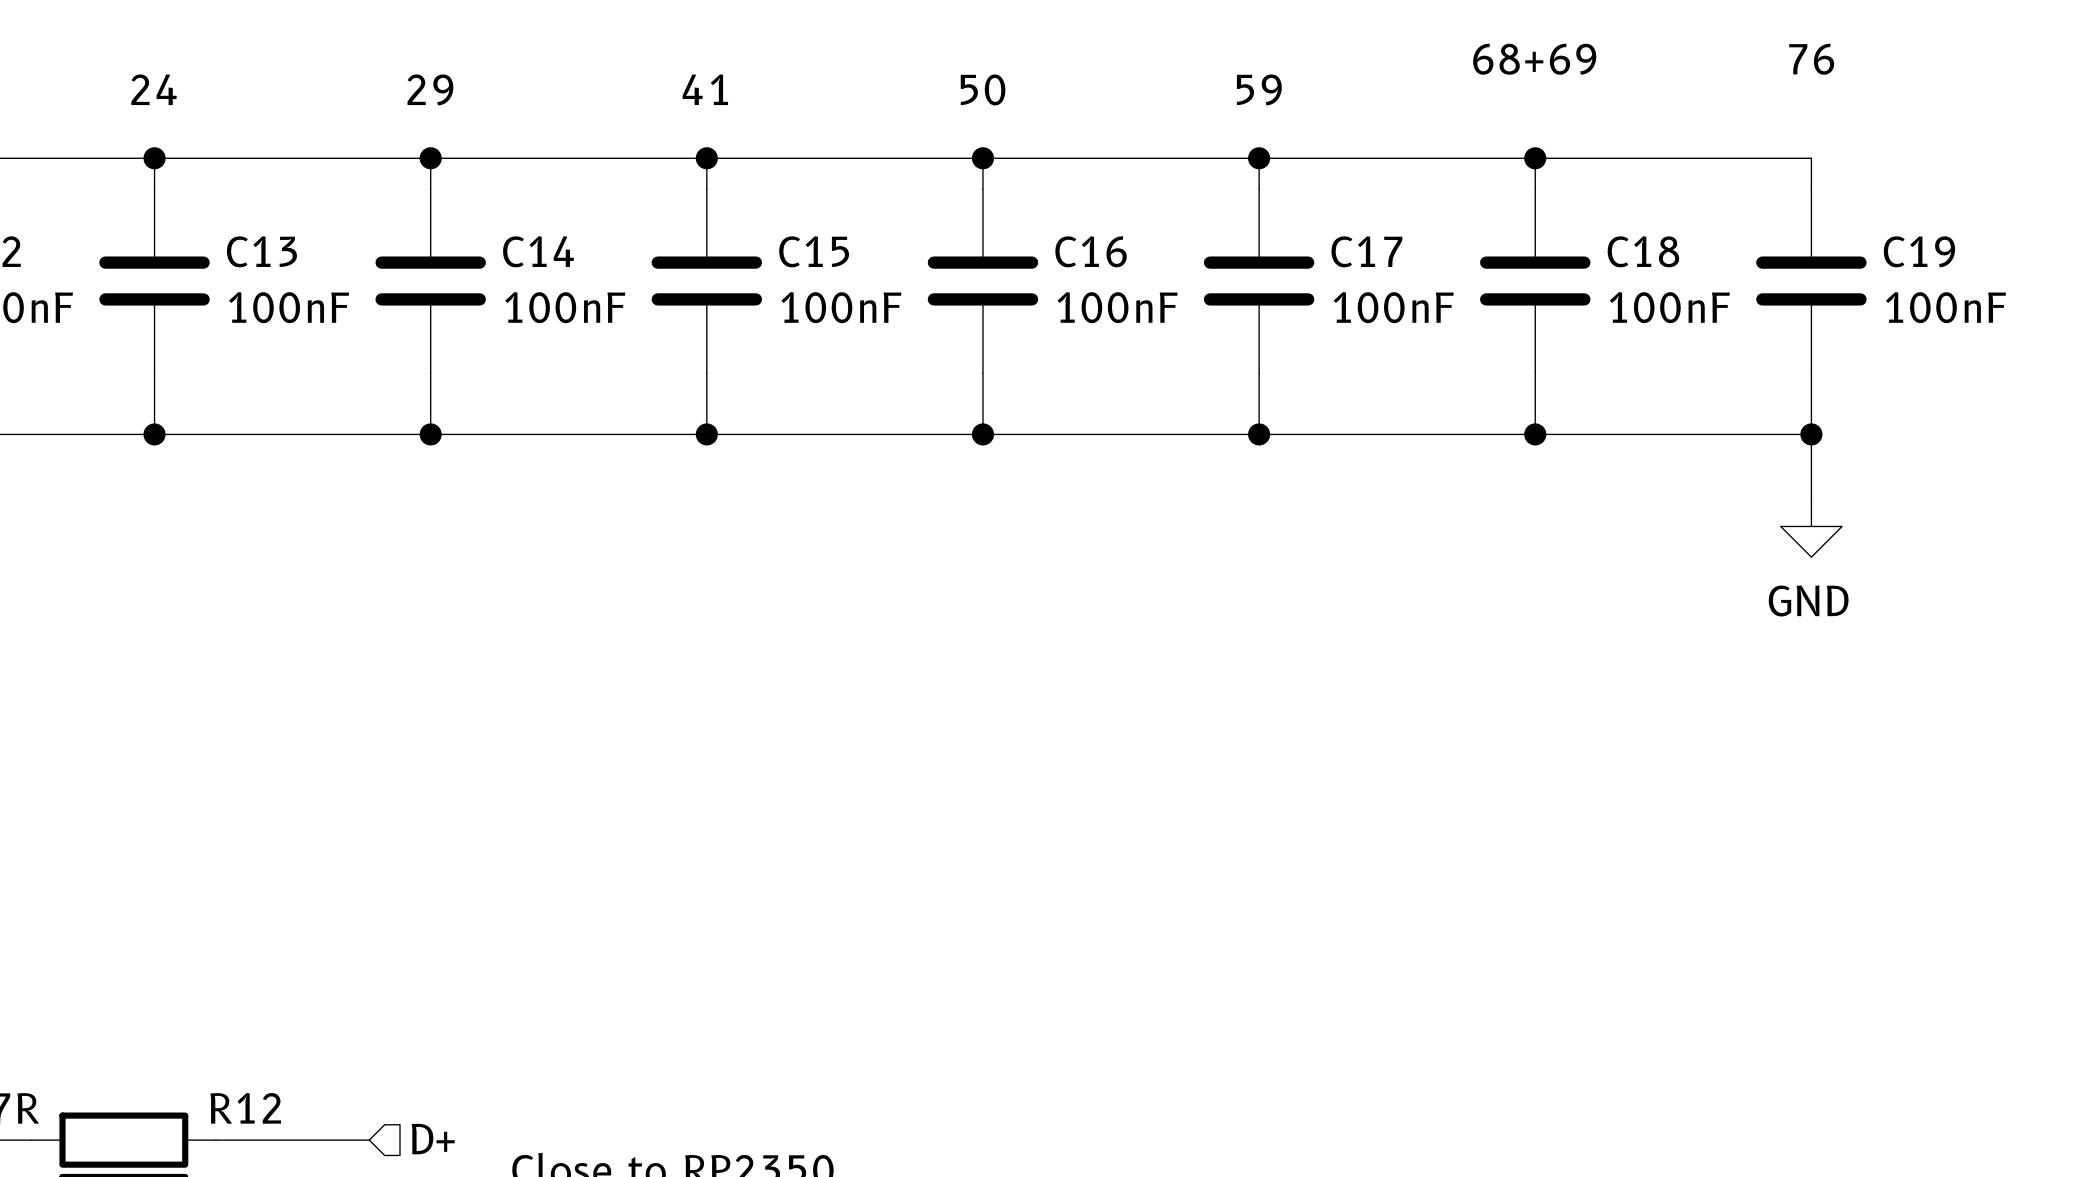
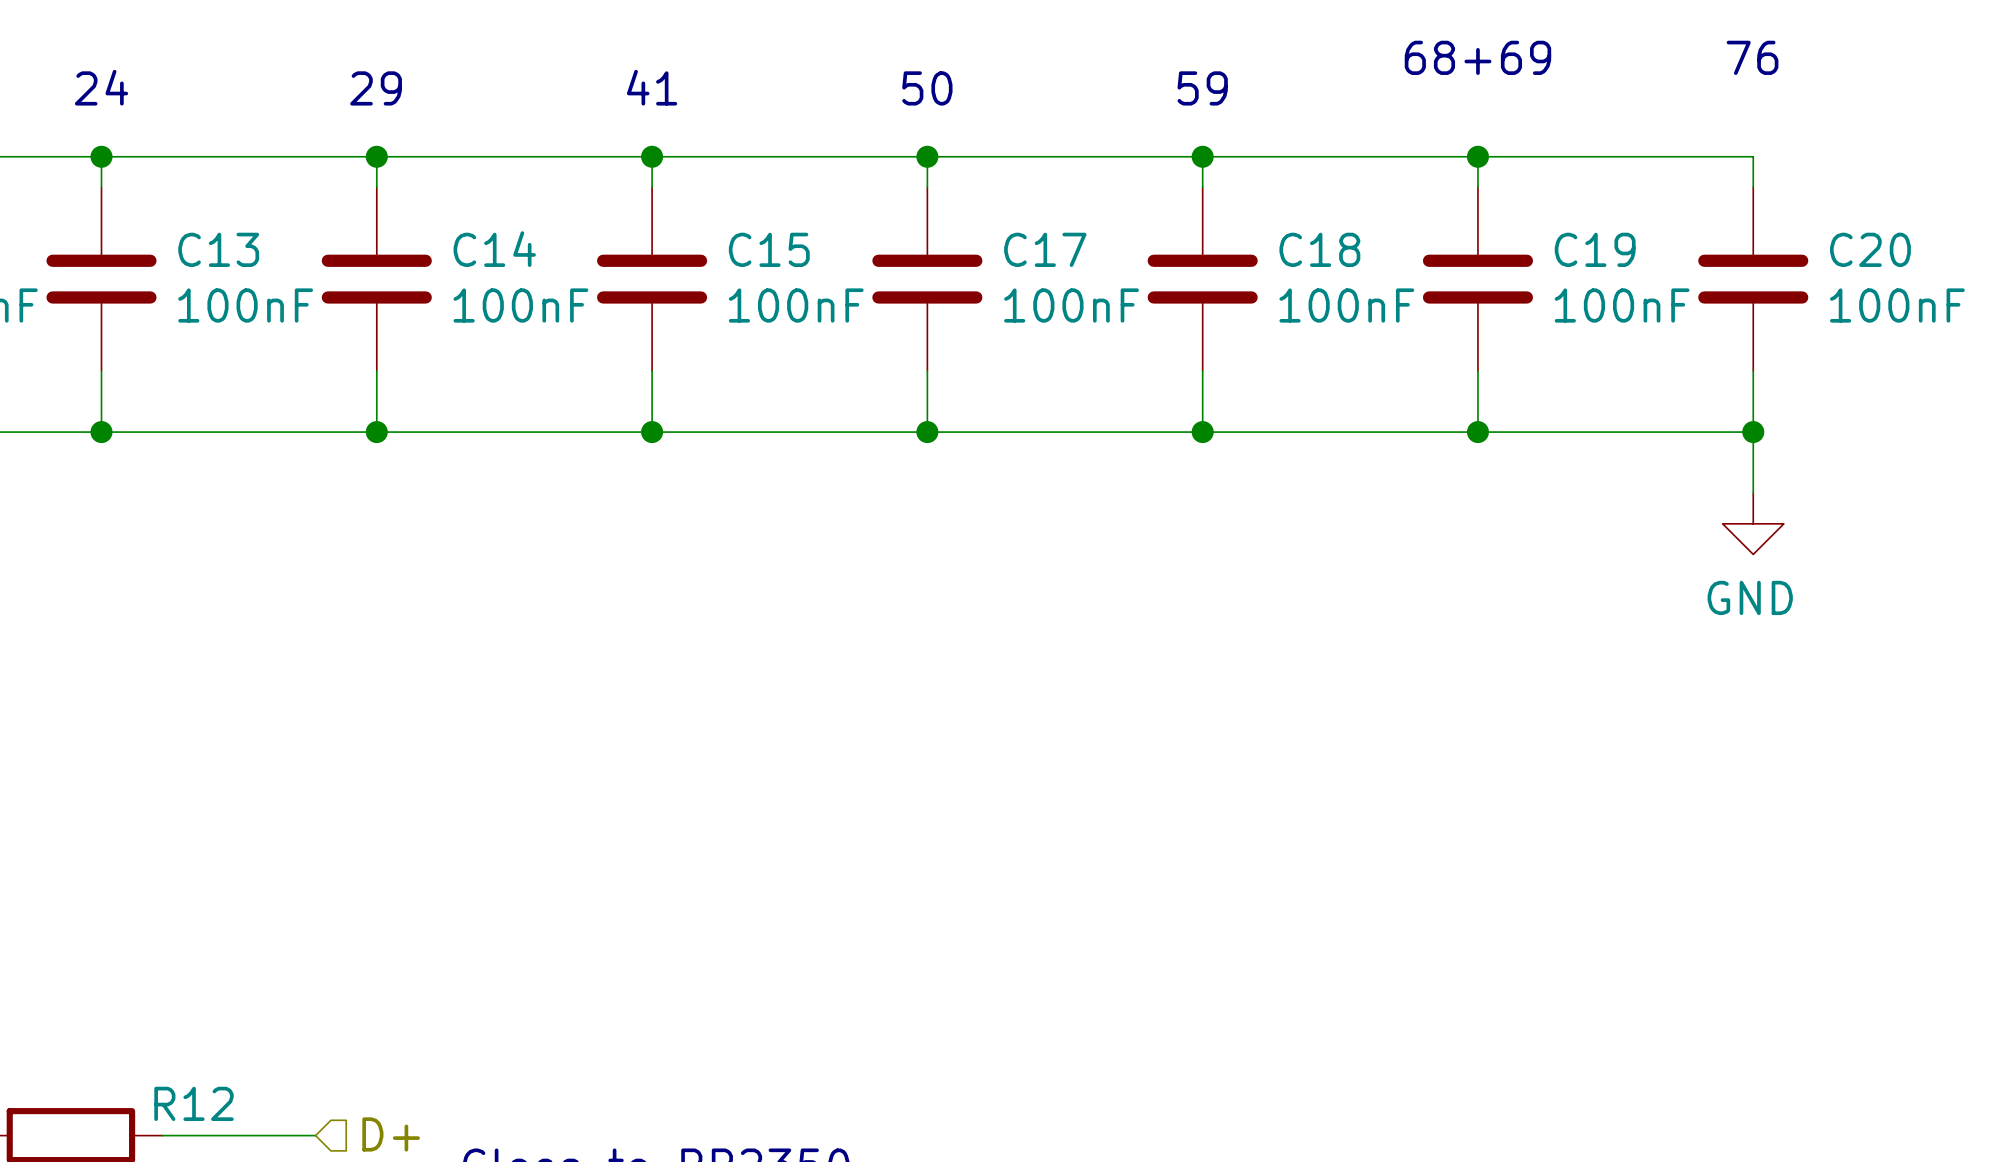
C16 name: C16 (1091, 251) -> C17 (1045, 249)
C17 name: C17 (1366, 251) -> C18 (1319, 249)
C18 name: C18 (1643, 251) -> C19 (1595, 249)
C19 name: C19 (1919, 251) -> C20 (1870, 249)

